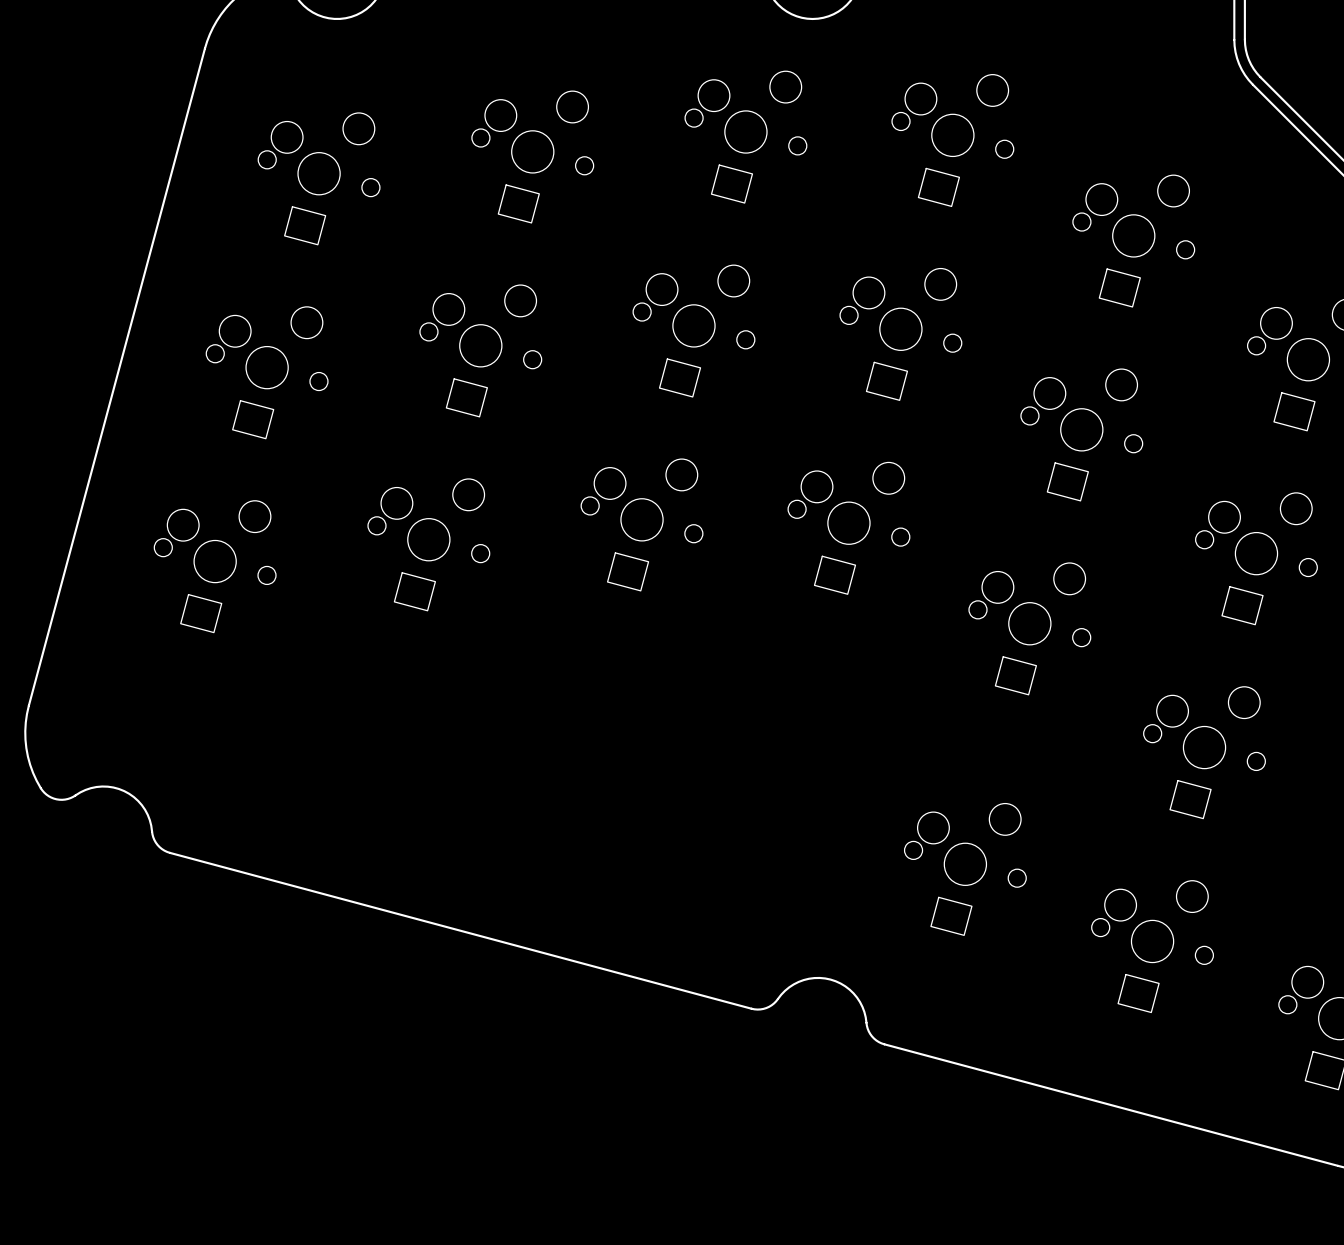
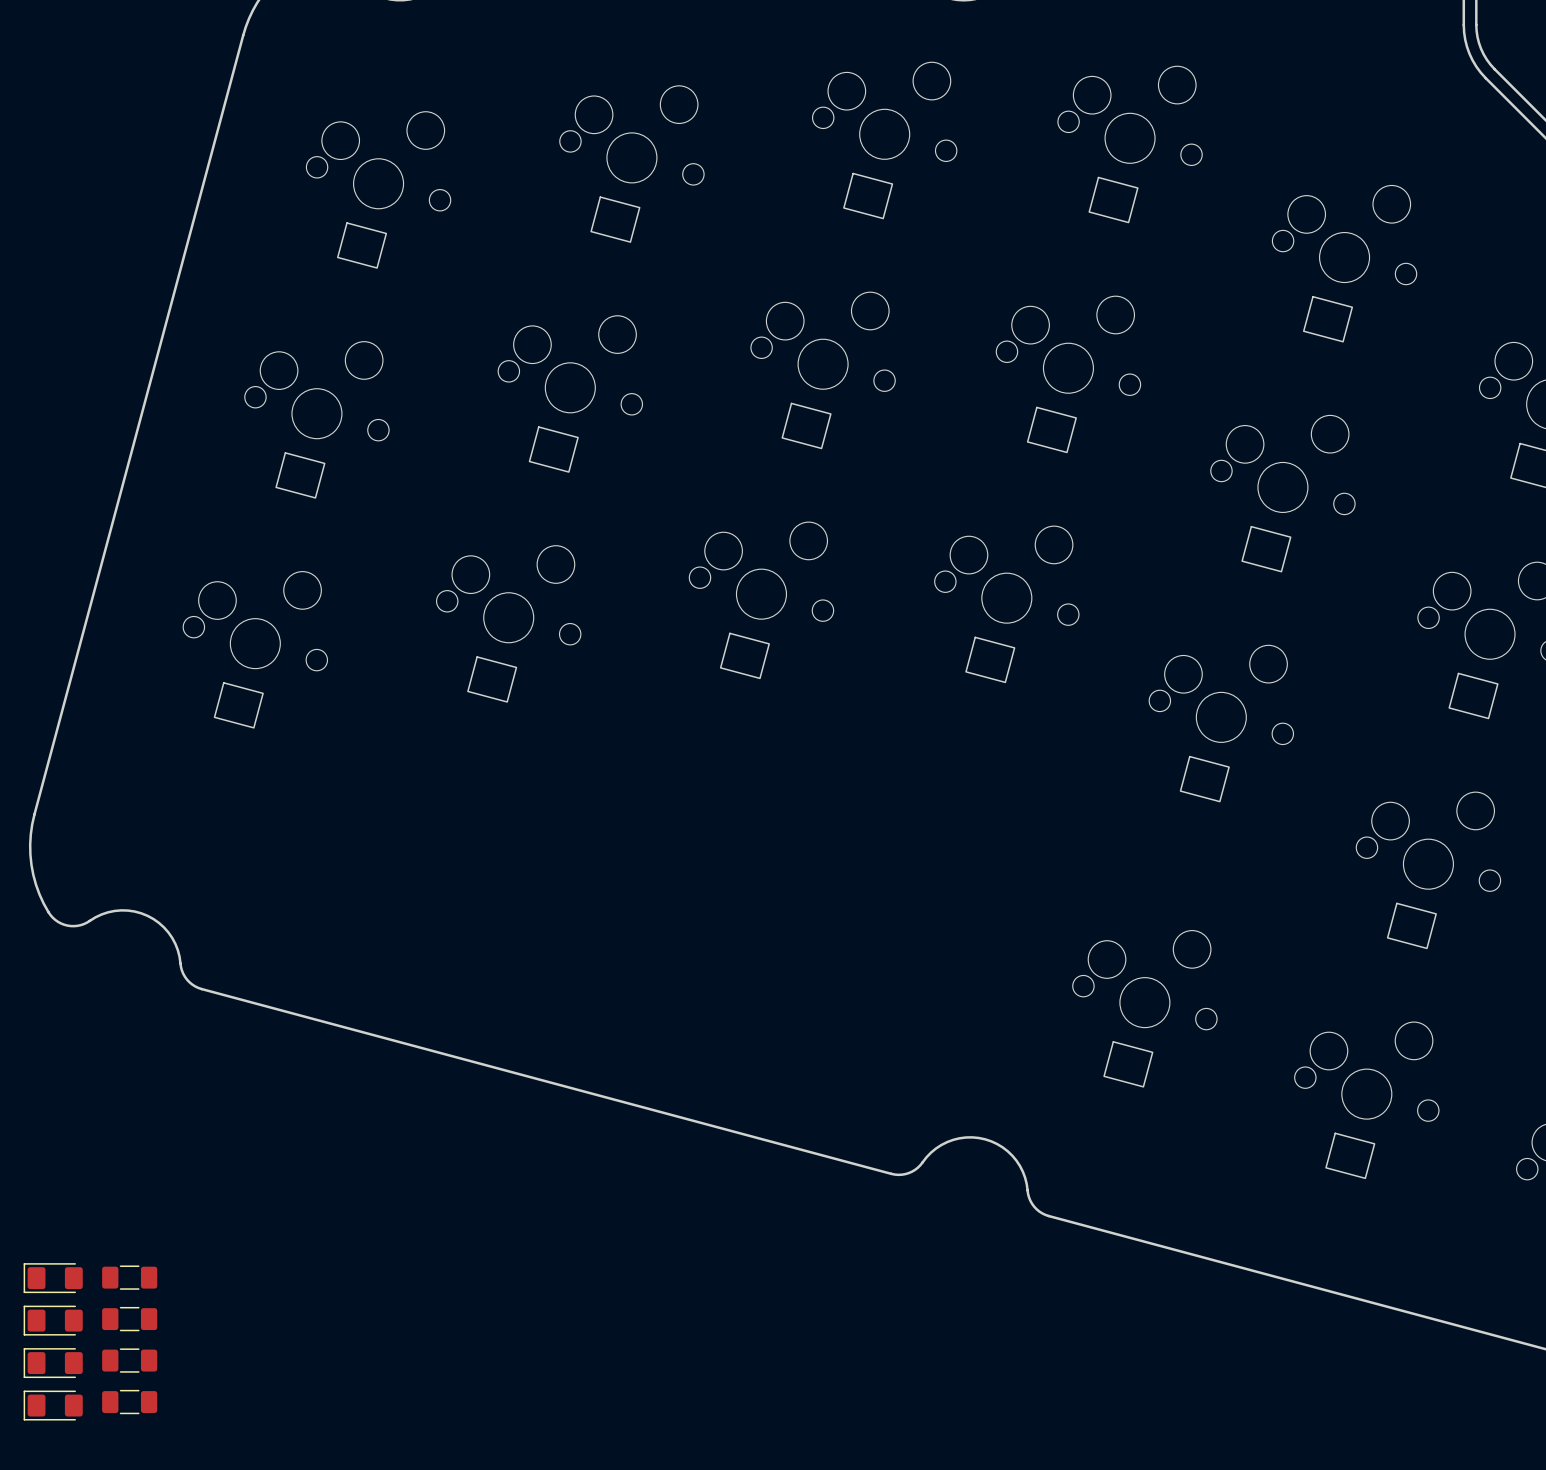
part: none -> (53, 1278)
part: none -> (129, 1277)
part: none -> (129, 1319)
part: none -> (53, 1320)
part: none -> (129, 1360)
part: none -> (53, 1363)
part: none -> (129, 1402)
part: none -> (53, 1405)

